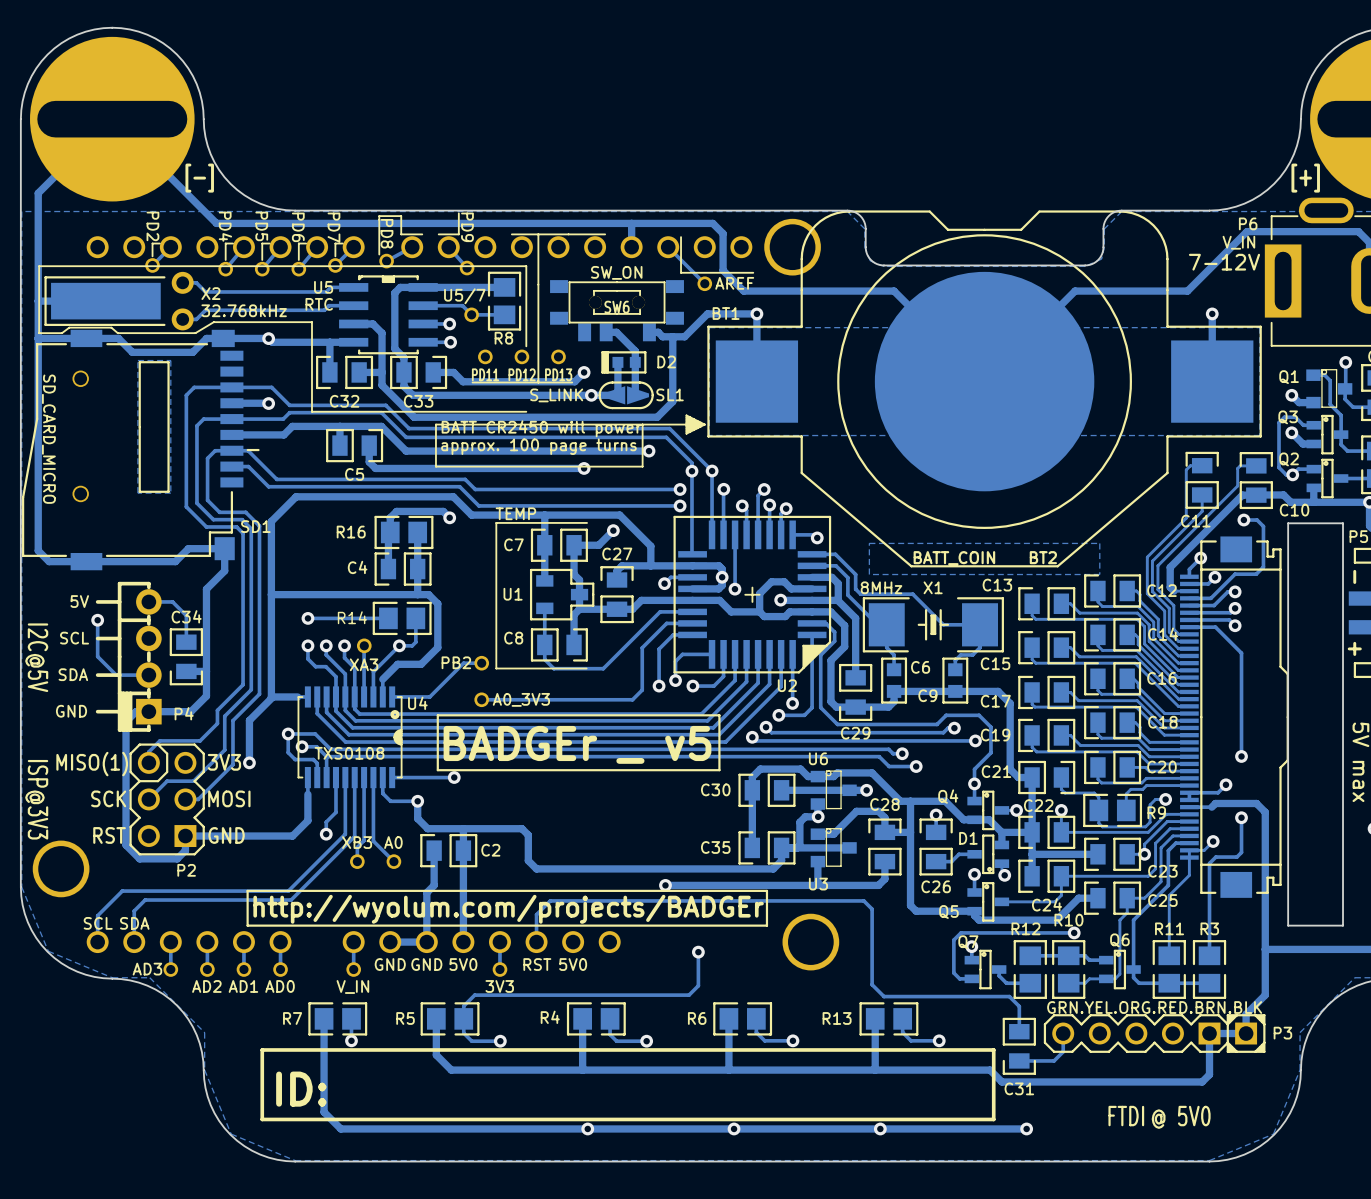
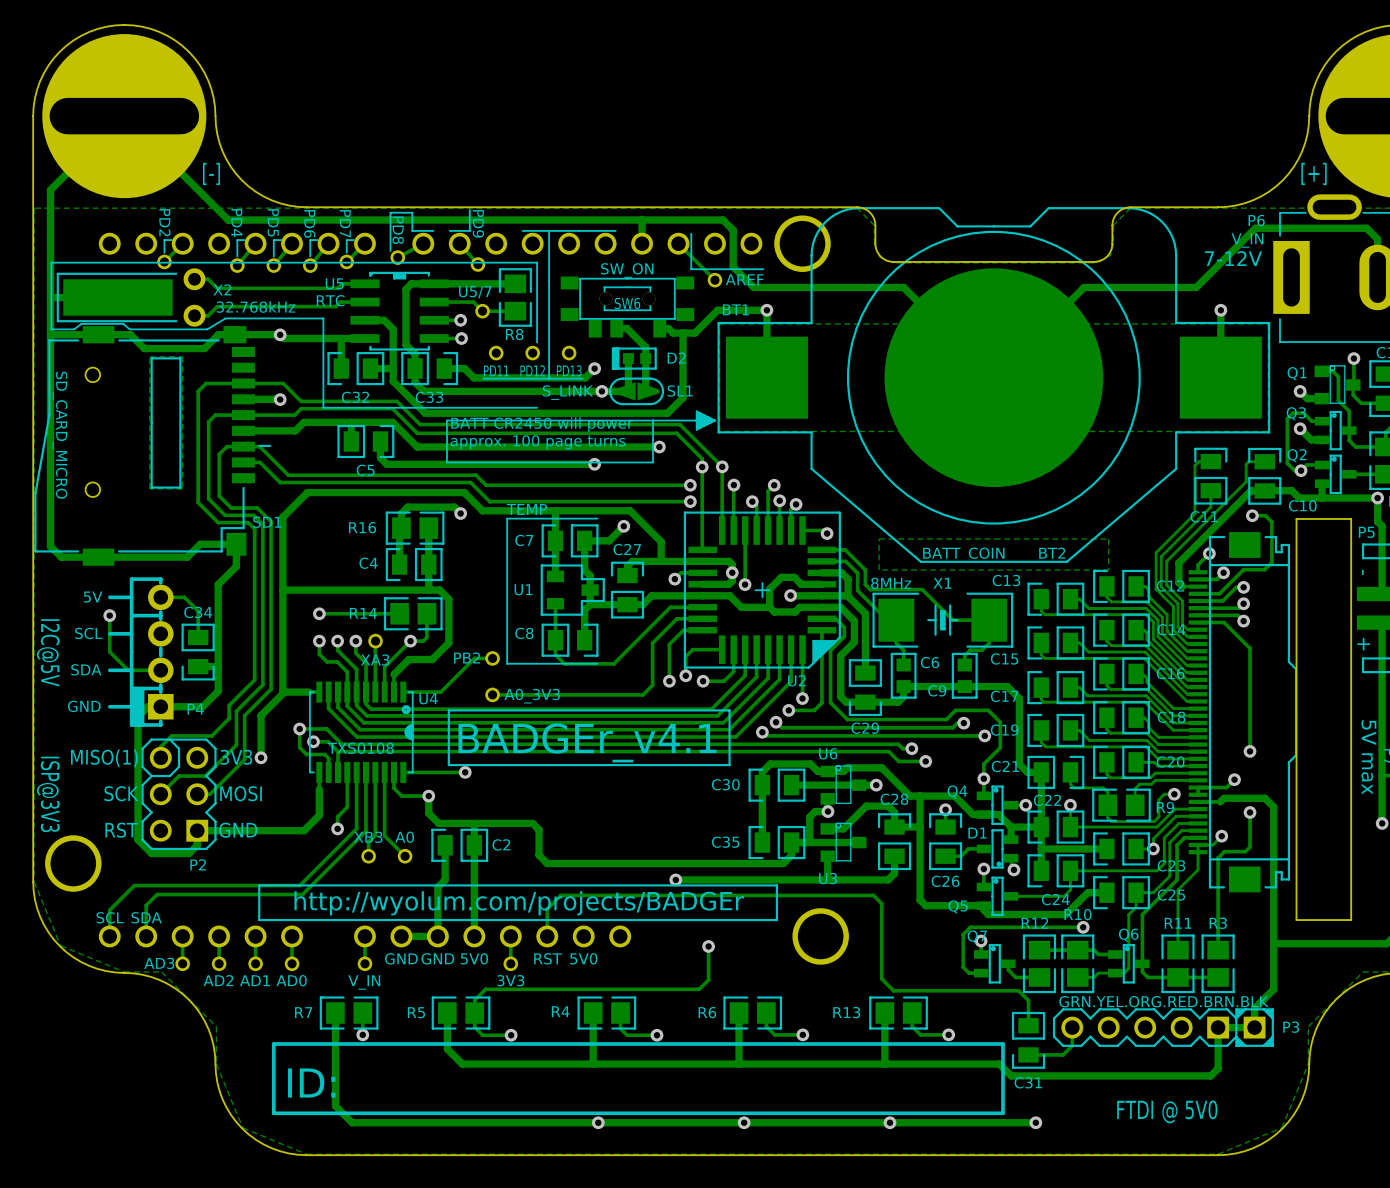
text: BADGEr _ v5 (577, 744) -> BADGEr_v4.1 (587, 742)

